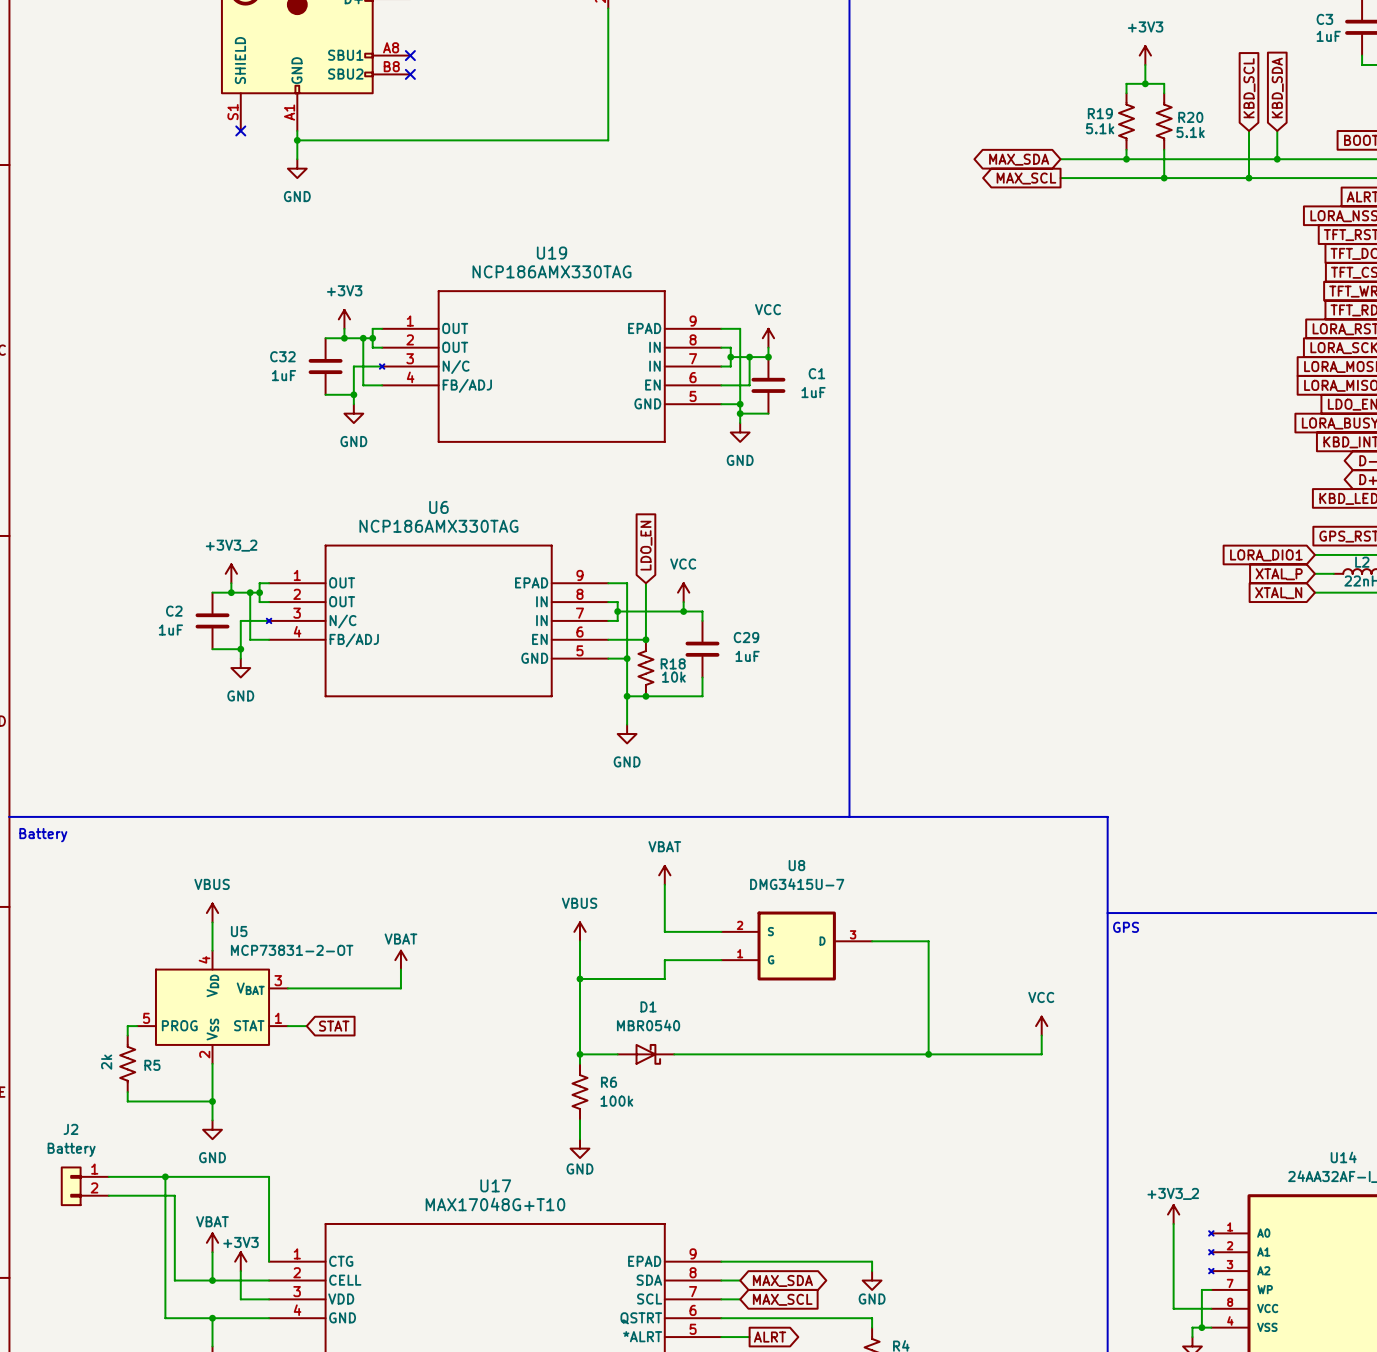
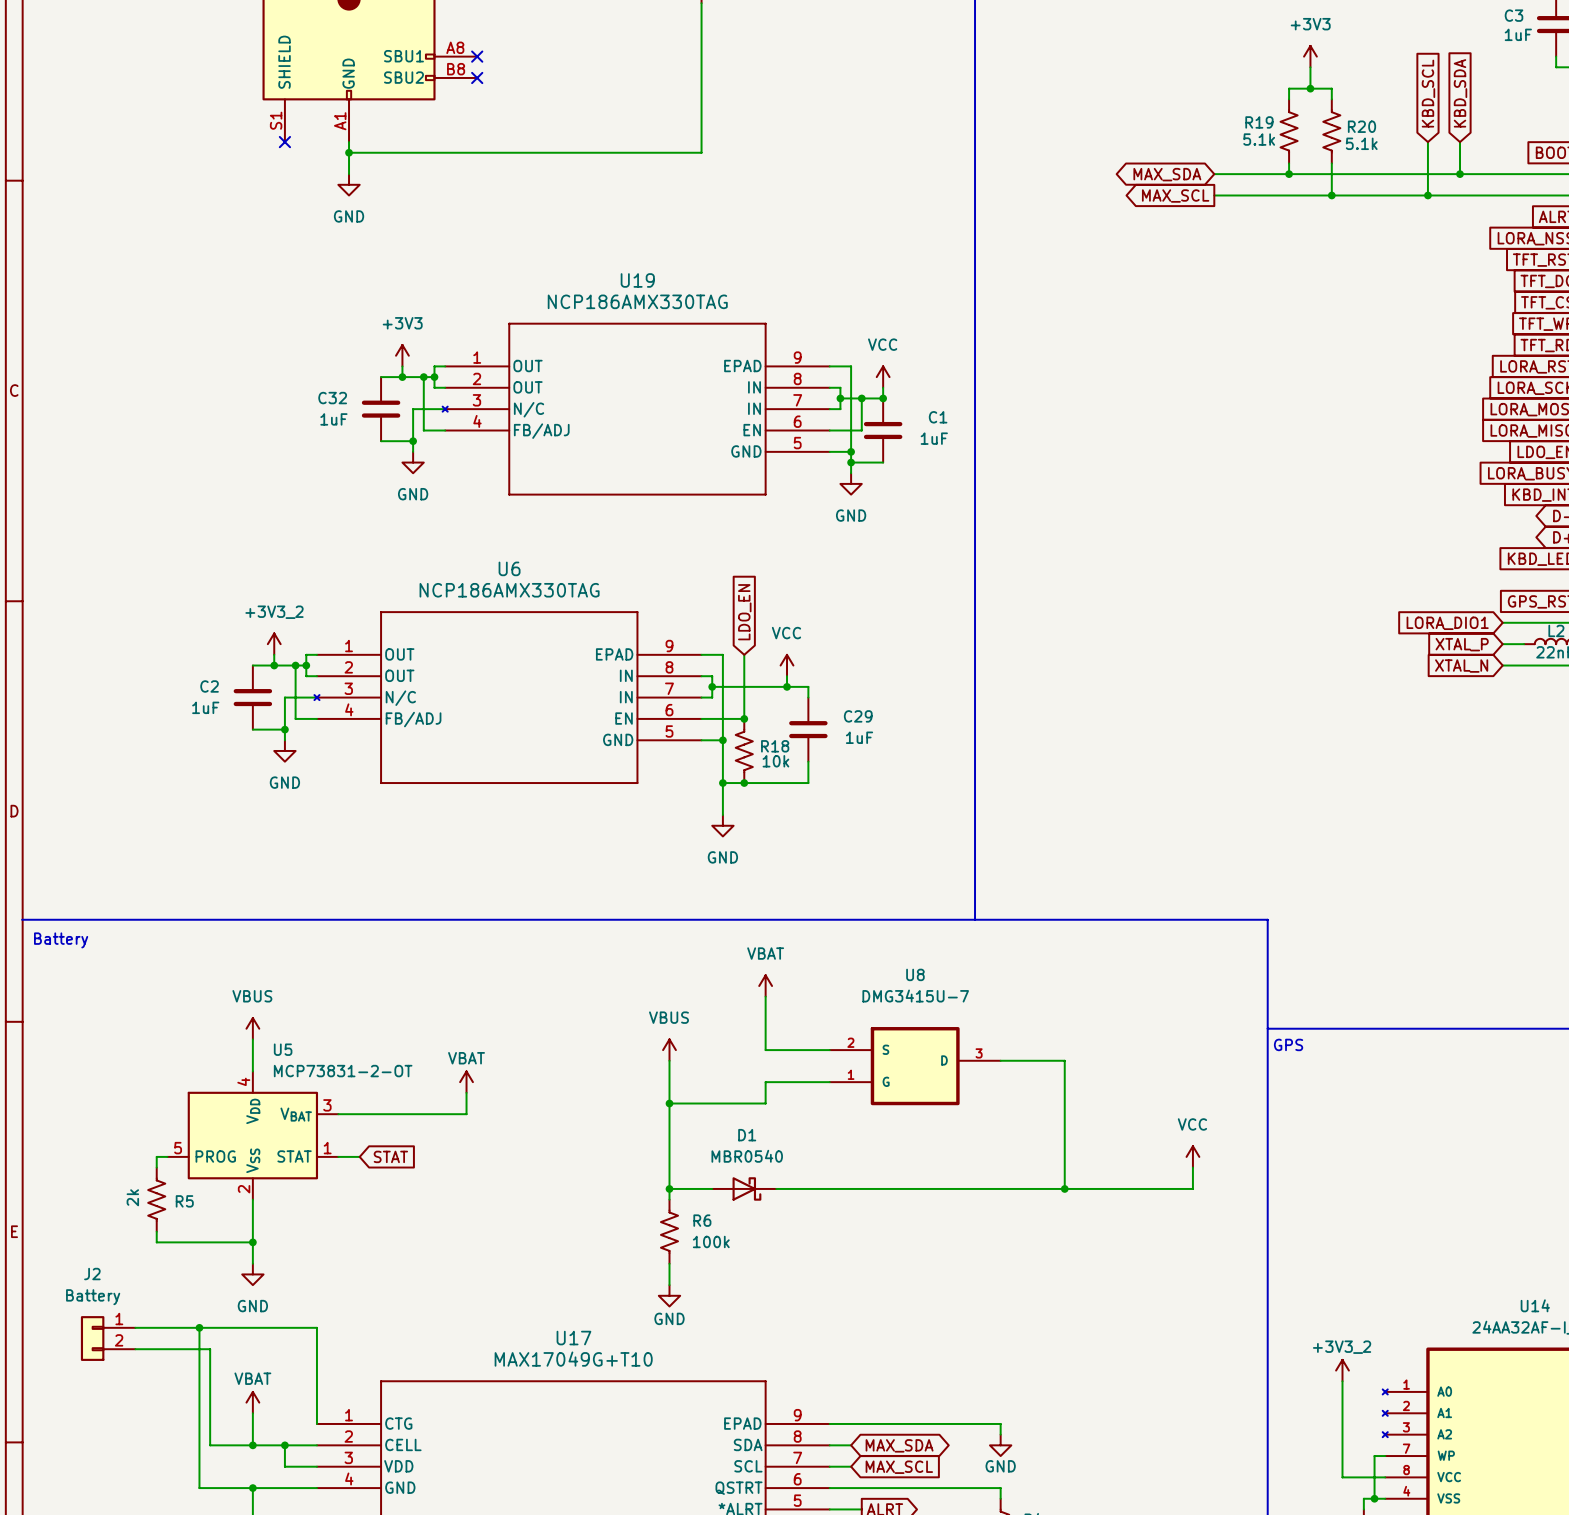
U17 value: MAX17048G+T10 (495, 1204) -> MAX17049G+T10 (573, 1359)
power symbol: +3V3 (240, 1261) -> none
wire: (240, 1271) (240, 1280) -> none
junction: none -> (284, 1445)

